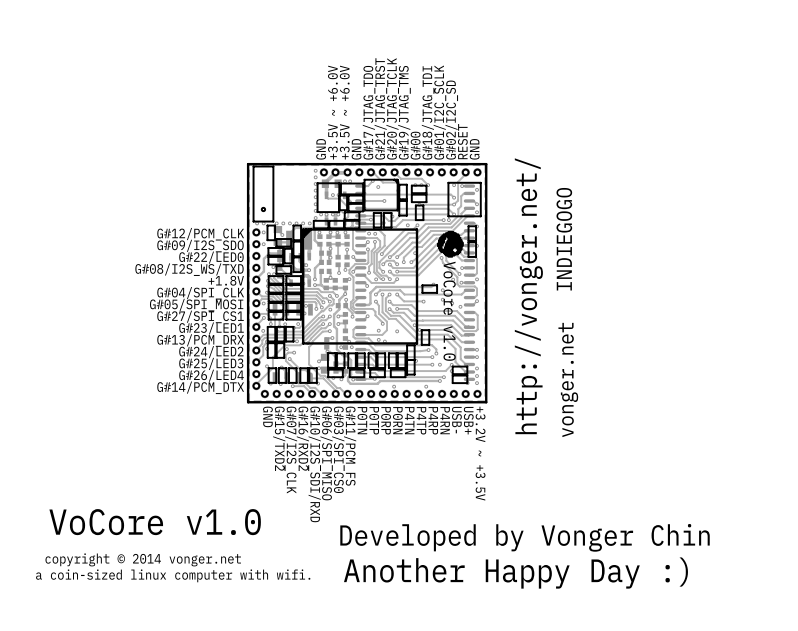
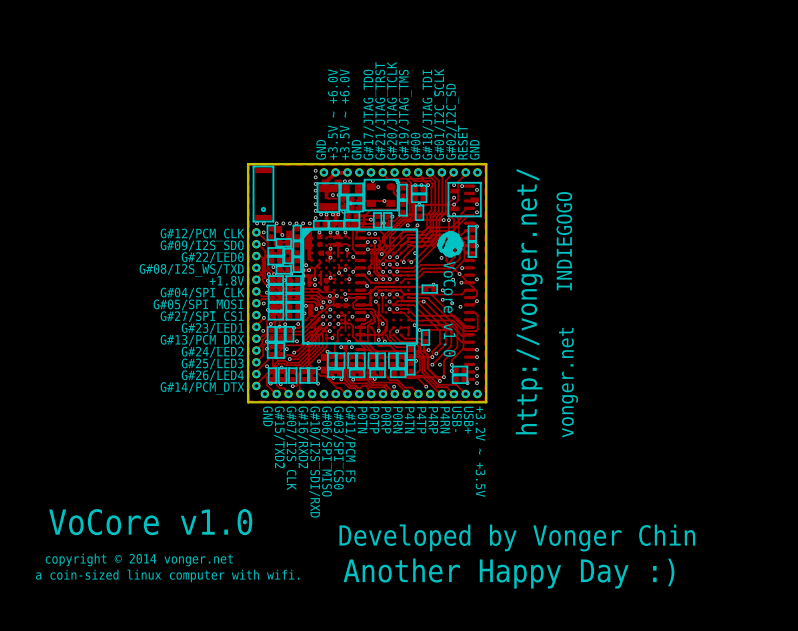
part footprint: [252, 165, 275, 223] -> [252, 165, 275, 223]
track: (370, 172) (382, 182) (397, 182) -> (386, 245) (382, 242) (382, 236) (402, 216) (409, 214) (408, 184) (405, 182) (397, 182)
track: none -> (406, 172) (414, 181) (429, 181) (432, 183) (431, 210) (427, 214) (427, 228) (423, 231) (402, 231) (400, 238)
track: none -> (430, 172) (438, 180) (438, 211) (433, 216) (433, 233) (428, 238) (408, 238)
track: none -> (442, 172) (442, 211) (436, 217) (436, 235) (430, 241) (407, 241) (400, 245)
track: none -> (453, 172) (445, 180) (445, 212) (439, 218) (439, 238) (432, 245) (408, 245)
track: (395, 173) (400, 178) -> (382, 172) (387, 178) (400, 178)
track: none -> (406, 178) (410, 182) (412, 216) (409, 219) (404, 219) (386, 238)
part footprint: [363, 179, 399, 212] -> [363, 179, 399, 212]
track: (372, 180) (368, 186) (360, 186) -> none
part footprint: [447, 181, 482, 218] -> [447, 181, 482, 218]
part footprint: [316, 182, 341, 214] -> [316, 182, 341, 214]
part footprint: [340, 182, 364, 196] -> [340, 182, 364, 196]
part footprint: [398, 183, 408, 201] -> [398, 183, 408, 201]
part footprint: [411, 184, 428, 194] -> [411, 184, 428, 194]
track: none -> (391, 186) (393, 186) (393, 192) (398, 197) (398, 207) (396, 209) (371, 209) (364, 216) (364, 224) (356, 231) (356, 238)
track: (360, 193) (451, 194) (454, 197) -> none
part footprint: [411, 193, 428, 203] -> [411, 193, 428, 203]
track: (469, 193) (463, 193) (461, 196) (458, 215) (450, 223) (425, 223) (416, 233) (406, 234) -> (419, 172) (418, 173) (423, 178) (431, 178) (435, 181) (435, 210) (430, 215) (430, 230) (426, 234) (406, 234)
part footprint: [338, 194, 348, 211] -> [338, 194, 348, 211]
part footprint: [347, 194, 364, 204] -> [347, 194, 364, 204]
part footprint: [398, 200, 408, 217] -> [398, 200, 408, 217]
part footprint: [347, 203, 364, 213] -> [347, 203, 364, 213]
part footprint: [415, 204, 425, 221] -> [415, 204, 425, 221]
track: (360, 208) (448, 208) (454, 214) -> (400, 282) (404, 279) (417, 279) (424, 272) (452, 272) (464, 260) (464, 242) (458, 236) (458, 219) (454, 214)
part footprint: [344, 211, 361, 221] -> [344, 211, 361, 221]
part footprint: [373, 212, 383, 229] -> [373, 212, 383, 229]
part footprint: [383, 212, 393, 229] -> [383, 212, 393, 229]
part footprint: [313, 220, 330, 230] -> [313, 220, 330, 230]
part footprint: [328, 220, 345, 230] -> [328, 220, 345, 230]
part footprint: [344, 220, 361, 230] -> [344, 220, 361, 230]
part footprint: [266, 224, 276, 241] -> [266, 224, 276, 241]
part footprint: [292, 224, 302, 241] -> [292, 224, 302, 241]
part footprint: [467, 225, 477, 242] -> [467, 225, 477, 242]
track: (314, 227) (314, 240) (320, 244) (320, 262) -> none
part footprint: [301, 228, 419, 345] -> [301, 228, 419, 345]
track: none -> (256, 232) (267, 242) (267, 267) (274, 274)
part footprint: [275, 238, 292, 248] -> [275, 238, 292, 248]
part footprint: [292, 240, 302, 257] -> [292, 240, 302, 257]
part: (328, 240) -> none
part: (347, 240) -> none
part footprint: [467, 241, 477, 258] -> [467, 241, 477, 258]
track: none -> (256, 244) (256, 242) (265, 251) (265, 269) (268, 274)
part footprint: [267, 247, 284, 257] -> [267, 247, 284, 257]
part footprint: [283, 247, 293, 265] -> [283, 247, 293, 265]
track: (368, 249) (368, 262) (355, 264) (349, 269) (349, 273) (353, 277) (353, 299) (350, 302) (350, 308) (355, 312) (360, 312) -> (368, 249) (382, 249) (386, 253) (389, 249) (389, 237) (405, 221) (411, 221) (414, 217) (415, 198)
track: none -> (256, 256) (262, 257) (262, 270) (265, 273) (265, 277) (267, 280) (272, 279)
part footprint: [267, 256, 284, 266] -> [267, 256, 284, 266]
part footprint: [292, 256, 302, 273] -> [292, 256, 302, 273]
track: (441, 257) (443, 262) (457, 277) (457, 284) (459, 286) (474, 286) (477, 291) -> (459, 273) (477, 291)
part: (338, 260) -> none
part: (347, 260) -> none
track: (469, 260) (461, 260) (451, 249) (443, 249) (418, 275) (415, 275) -> (454, 197) (448, 203) (448, 214) (453, 219) (453, 238) (459, 244) (459, 258) (449, 268) (422, 268) (415, 275)
part: (325, 262) -> none
part footprint: [275, 265, 292, 275] -> [275, 265, 292, 275]
track: none -> (256, 267) (262, 274) (262, 281) (272, 288)
part: (325, 271) -> none
track: (414, 271) (441, 246) (453, 246) (464, 256) (474, 256) (477, 258) (477, 273) (474, 275) (469, 275) -> (414, 271) (420, 265) (446, 265) (455, 256) (455, 246) (448, 240) (448, 220)
part footprint: [267, 275, 285, 285] -> [267, 275, 285, 285]
part footprint: [285, 275, 302, 285] -> [285, 275, 302, 285]
part footprint: [267, 284, 285, 294] -> [267, 284, 285, 294]
part footprint: [285, 284, 302, 294] -> [285, 284, 302, 294]
part: (335, 284) -> none
part: (345, 284) -> none
part footprint: [421, 284, 438, 294] -> [421, 284, 438, 294]
track: (314, 285) (321, 285) (324, 287) (345, 287) (345, 293) (339, 299) (339, 309) (334, 314) (334, 326) (336, 329) (336, 349) (351, 360) (351, 374) (348, 377) (350, 383) (377, 383) (380, 380) (439, 380) -> (400, 334) (404, 338) (420, 338) (424, 342) (424, 351) (427, 355) (427, 368) (439, 380)
track: none -> (371, 290) (367, 294) (345, 294)
part footprint: [267, 293, 285, 303] -> [267, 293, 285, 303]
part footprint: [285, 293, 302, 303] -> [285, 293, 302, 303]
track: (389, 294) (385, 298) (385, 310) (391, 315) (399, 315) (418, 334) (447, 334) (460, 347) (460, 359) (465, 364) (469, 364) -> (389, 294) (393, 290)
track: none -> (408, 297) (427, 297) (457, 327) (457, 347) (443, 360) (443, 377)
track: (346, 299) (345, 305) (352, 313) (352, 316) -> (346, 299) (358, 297)
part footprint: [267, 302, 285, 312] -> [267, 302, 285, 312]
part footprint: [285, 302, 302, 312] -> [285, 302, 302, 312]
track: (411, 305) (417, 311) (456, 311) (465, 320) (470, 319) -> (411, 305) (413, 305) (439, 331) (439, 344) (432, 351) (432, 357)
part footprint: [267, 311, 285, 321] -> [267, 311, 285, 321]
part footprint: [285, 311, 302, 321] -> [285, 311, 302, 321]
track: none -> (341, 312) (345, 316) (345, 321) (352, 326) (352, 336) (364, 348) (364, 353) (360, 357)
track: none -> (371, 312) (374, 321) (367, 326) (367, 343) (385, 361) (385, 376) (390, 380) (397, 380) (404, 387) (412, 387) (418, 391) (418, 393)
track: none -> (378, 312) (378, 339)
track: (382, 312) (389, 318) (395, 318) (416, 339) (446, 339) (455, 348) (455, 362) (464, 372) (469, 372) -> none
track: (256, 315) (266, 313) (270, 317) (270, 324) -> (319, 312) (305, 320) (276, 320) (270, 324)
track: (329, 316) (326, 320) (321, 320) (303, 337) (264, 337) -> (272, 315) (267, 320) (267, 335) (264, 337)
part: (345, 318) -> none
track: none -> (371, 320) (360, 325) (360, 339) (372, 351) (372, 356) (367, 361) (367, 377) (373, 382) (396, 382) (406, 393)
part footprint: [267, 326, 276, 343] -> [267, 326, 276, 343]
part footprint: [276, 326, 286, 343] -> [276, 326, 286, 343]
part footprint: [285, 326, 295, 343] -> [285, 326, 295, 343]
track: none -> (319, 327) (315, 333) (315, 345) (298, 362) (278, 360) (274, 364) (274, 371) (267, 377) (267, 385) (276, 393)
track: none -> (341, 327) (337, 331) (334, 354) (327, 361) (327, 376) (333, 383) (344, 383) (349, 388) (354, 388) (359, 393)
track: (360, 327) (353, 329) (355, 338) (368, 338) (375, 345) (432, 345) (436, 349) (436, 353) -> (393, 305) (397, 301) (416, 301) (445, 330) (445, 344) (436, 353)
track: none -> (371, 327) (374, 333) (374, 342) (378, 345) (390, 345) (406, 361) (407, 375) (421, 375) (442, 393)
track: none -> (386, 327) (382, 333) (384, 341)
track: none -> (393, 327) (389, 331) (389, 336) (397, 344) (416, 344) (418, 346) (418, 354) (422, 357) (422, 372) (437, 387) (446, 387) (453, 393)
part footprint: [421, 329, 431, 346] -> [421, 329, 431, 346]
track: none -> (397, 331) (401, 327) (408, 327) (408, 334)
track: none -> (319, 334) (319, 346) (300, 365) (279, 363) (276, 366) (276, 385) (279, 388) (283, 388) (288, 393)
track: none -> (326, 334) (326, 346) (305, 367) (305, 371) (299, 376) (300, 393)
part: (345, 334) -> none
track: none -> (386, 334) (396, 347) (410, 347) (416, 350) (416, 355) (419, 359) (419, 370) (417, 372) (410, 372) (410, 371)
track: none -> (393, 334) (400, 341) (418, 341) (420, 344) (420, 352) (424, 356) (424, 371) (438, 384) (456, 384) (465, 393)
part footprint: [267, 342, 276, 359] -> [267, 342, 276, 359]
part footprint: [275, 342, 285, 359] -> [275, 342, 285, 359]
track: none -> (307, 343) (296, 356) (286, 355) (283, 358) (276, 358) (269, 354) (269, 358) (256, 371) (256, 374)
part: (326, 343) -> none
part footprint: [406, 344, 416, 361] -> [406, 344, 416, 361]
track: none -> (345, 346) (345, 350) (352, 356) (347, 361) (347, 379) (351, 383) (366, 383) (370, 387) (384, 387) (386, 393) (382, 393)
track: (294, 352) (288, 352) (285, 355) (285, 360) (298, 373) (298, 383) (305, 383) (310, 387) (315, 387) (321, 394) (323, 393) -> (294, 352) (303, 345) (303, 337) (315, 329) (315, 324) (319, 320)
part footprint: [327, 352, 337, 369] -> [327, 352, 337, 369]
part footprint: [336, 352, 346, 369] -> [336, 352, 346, 369]
part footprint: [347, 352, 357, 369] -> [347, 352, 357, 369]
part footprint: [356, 352, 366, 369] -> [356, 352, 366, 369]
part footprint: [367, 352, 377, 369] -> [367, 352, 377, 369]
part footprint: [376, 352, 386, 369] -> [376, 352, 386, 369]
part footprint: [388, 352, 398, 369] -> [388, 352, 398, 369]
part footprint: [397, 352, 407, 369] -> [397, 352, 407, 369]
track: none -> (340, 355) (346, 356) (343, 369) (345, 380) (350, 385) (357, 387) (365, 385) (368, 388) (368, 394) (371, 393)
track: none -> (360, 355) (365, 361) (365, 378) (372, 385) (385, 385) (394, 393)
track: (360, 357) (370, 357) (378, 364) (432, 364) -> (423, 301) (451, 328) (451, 345) (432, 364)
track: (289, 359) (300, 370) (305, 370) (310, 374) (310, 378) (323, 378) (335, 390) (335, 393) -> (289, 359) (297, 359) (311, 345) (311, 334)
part footprint: [406, 359, 416, 376] -> [406, 359, 416, 376]
track: (360, 364) (372, 364) (378, 371) (445, 371) (451, 364) -> (400, 297) (404, 293) (430, 293) (463, 326) (463, 348) (451, 360) (451, 364)
part footprint: [451, 365, 469, 375] -> [451, 365, 469, 375]
part footprint: [267, 367, 277, 384] -> [267, 367, 277, 384]
part footprint: [278, 367, 288, 384] -> [278, 367, 288, 384]
part footprint: [288, 367, 298, 384] -> [288, 367, 298, 384]
part footprint: [299, 367, 309, 384] -> [299, 367, 309, 384]
part footprint: [308, 367, 318, 384] -> [308, 367, 318, 384]
part footprint: [327, 368, 344, 378] -> [327, 368, 344, 378]
part footprint: [348, 368, 366, 378] -> [348, 368, 366, 378]
part footprint: [369, 368, 386, 378] -> [369, 368, 386, 378]
part footprint: [390, 368, 407, 378] -> [390, 368, 407, 378]
track: none -> (401, 373) (406, 378) (417, 378) (426, 386)
part footprint: [451, 374, 469, 384] -> [451, 374, 469, 384]
track: (295, 386) (304, 386) (312, 393) -> (295, 386) (297, 376) (292, 371) (297, 367) (301, 367) (322, 346) (322, 331) (326, 327)

